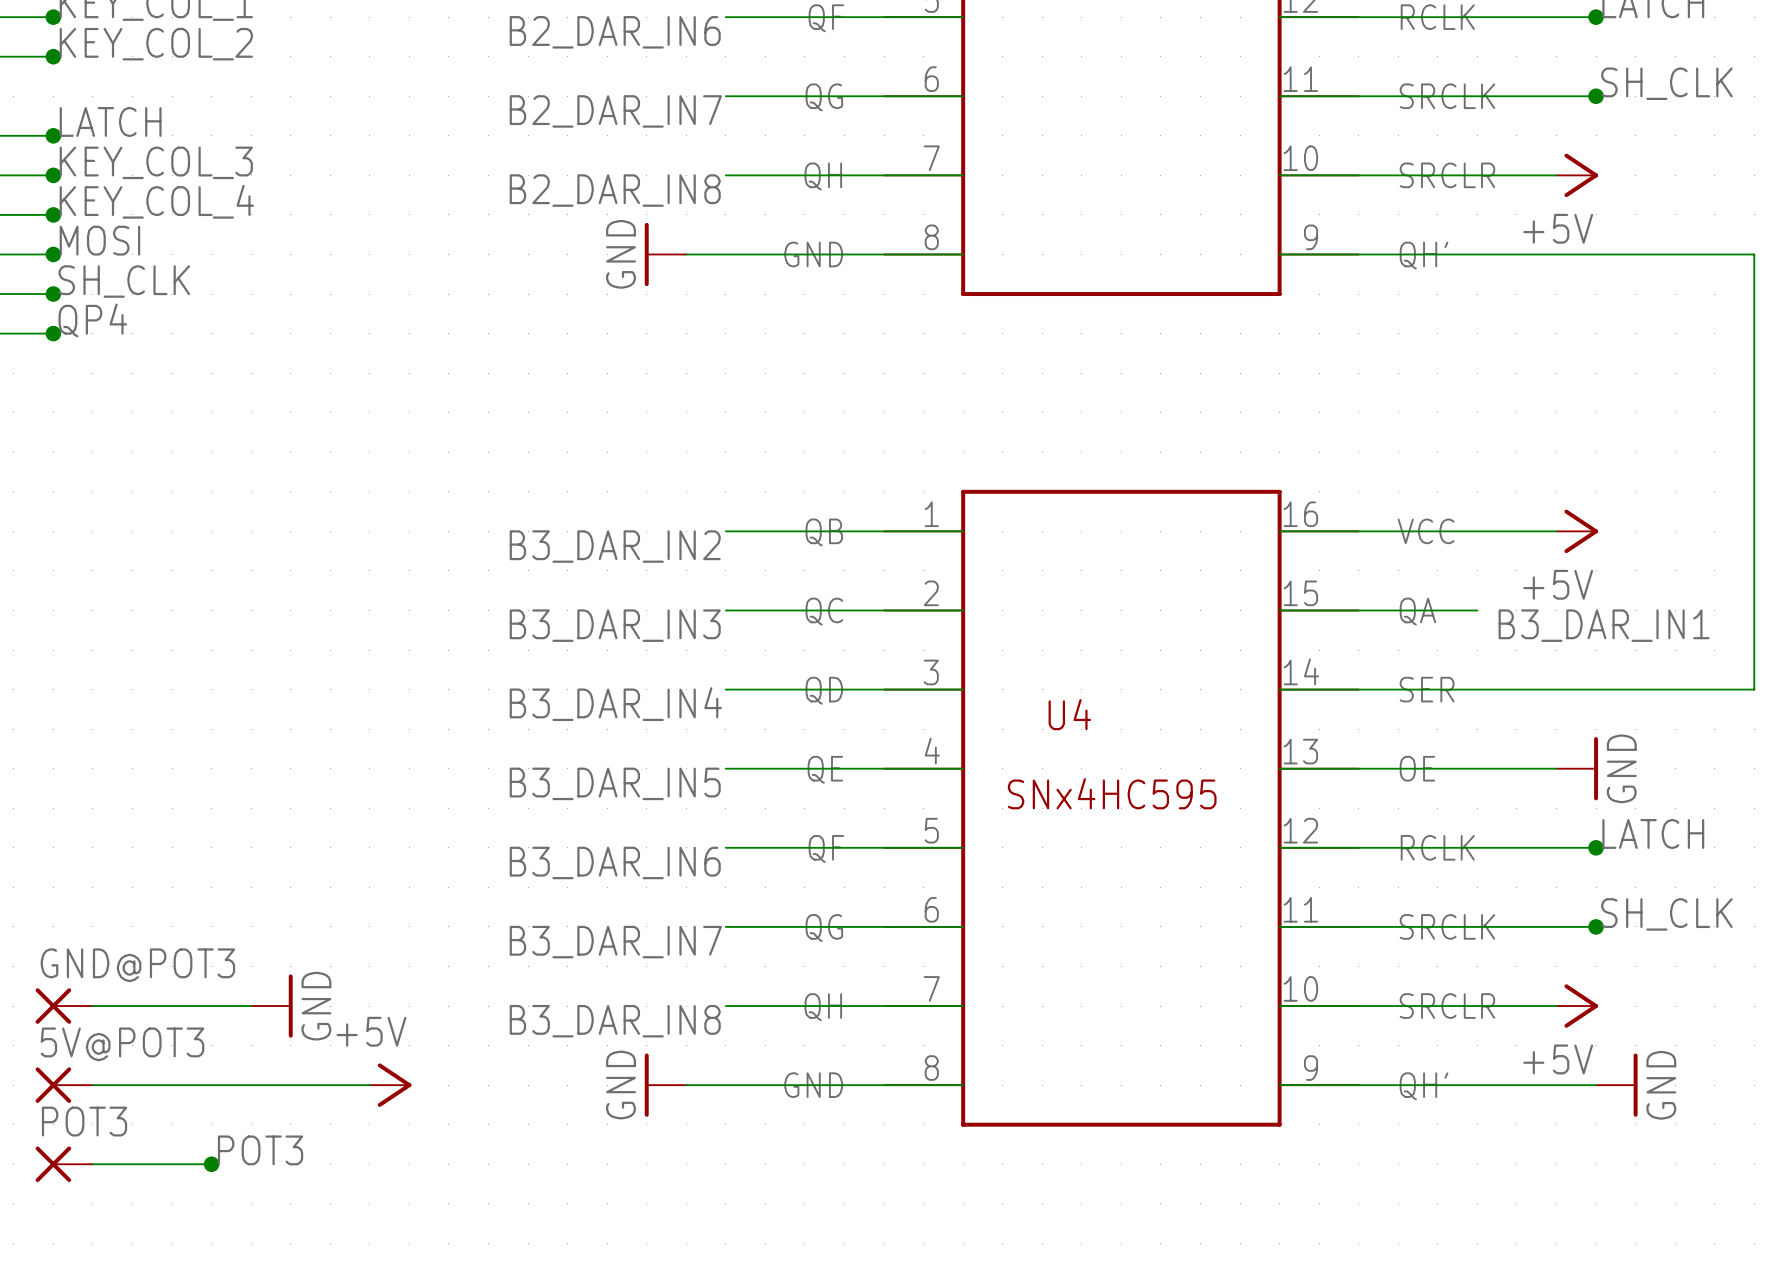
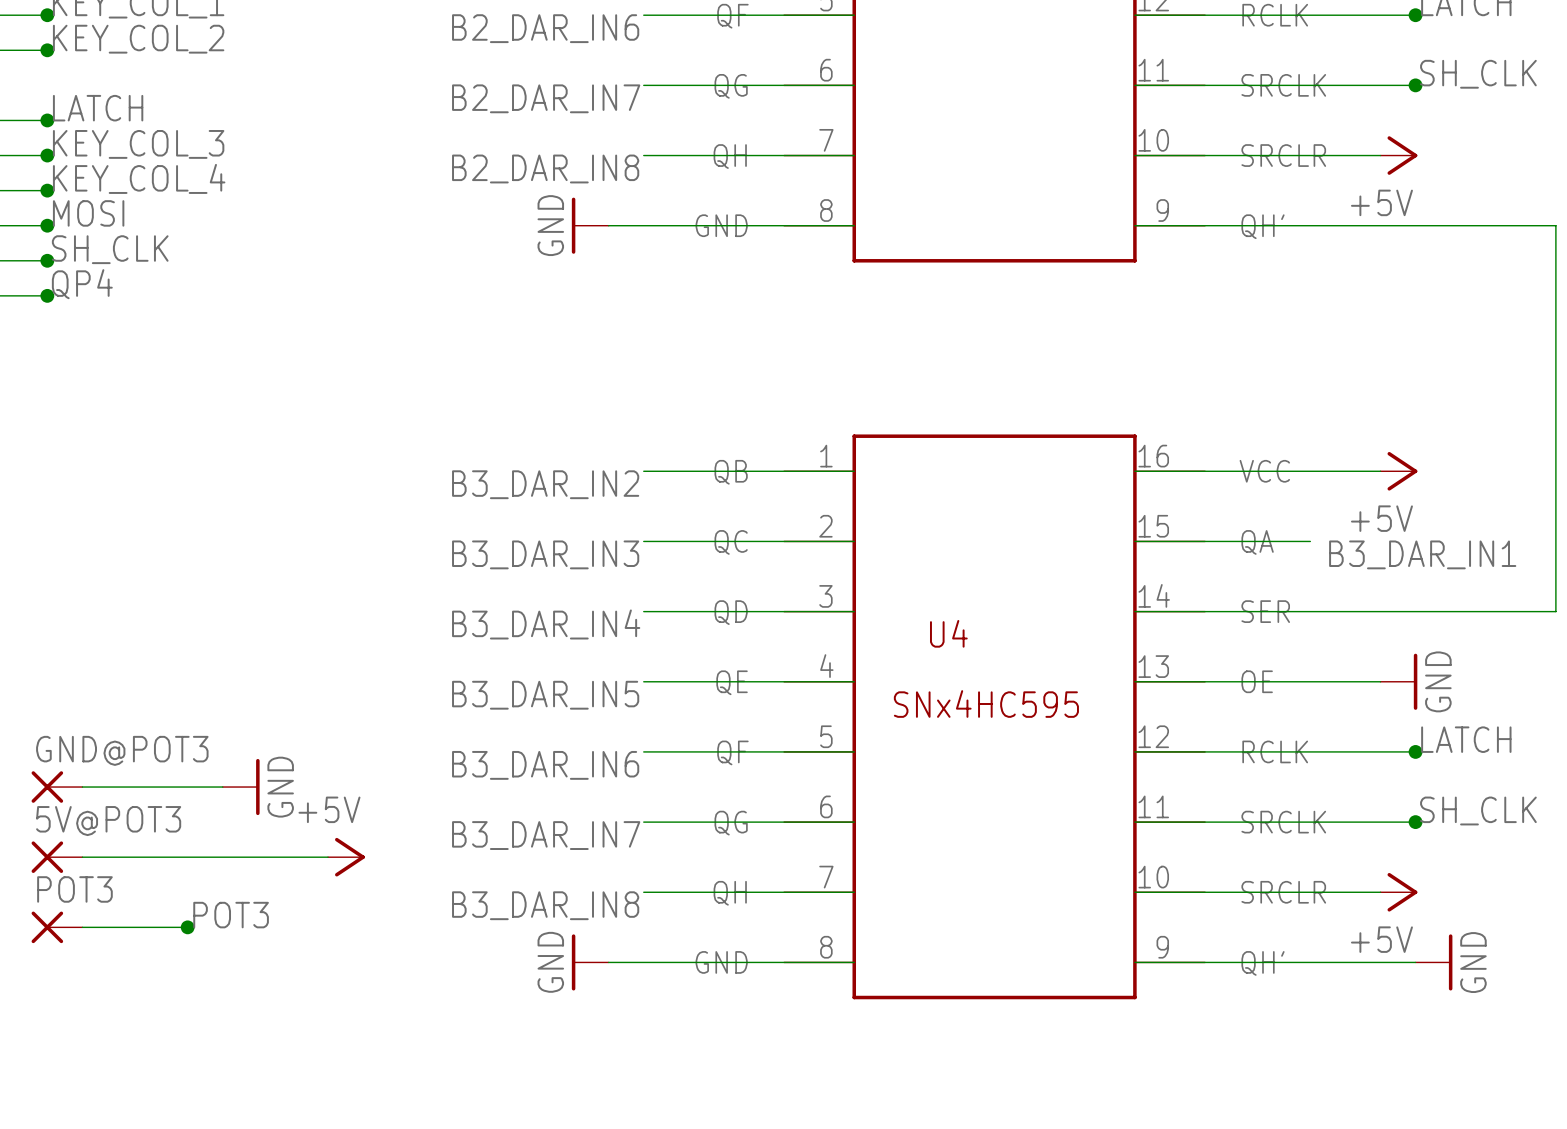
GND@POT3 position: (64, 1006) -> (57, 787)
wire: (92, 1006) (251, 1006) -> (82, 787) (222, 787)
power symbol position: GND (271, 1006) -> GND (241, 787)
junction: none -> (187, 927)
5V@POT3 position: (64, 1085) -> (57, 857)
wire: (92, 1085) (369, 1085) -> (82, 857) (328, 857)
power symbol position: +5V (390, 1085) -> +5V (346, 857)
label position: POT3 (260, 1150) -> POT3 (231, 915)
POT3 position: (64, 1164) -> (57, 927)
wire: (92, 1164) (211, 1164) -> (82, 927) (187, 927)
junction: (211, 1164) -> none

